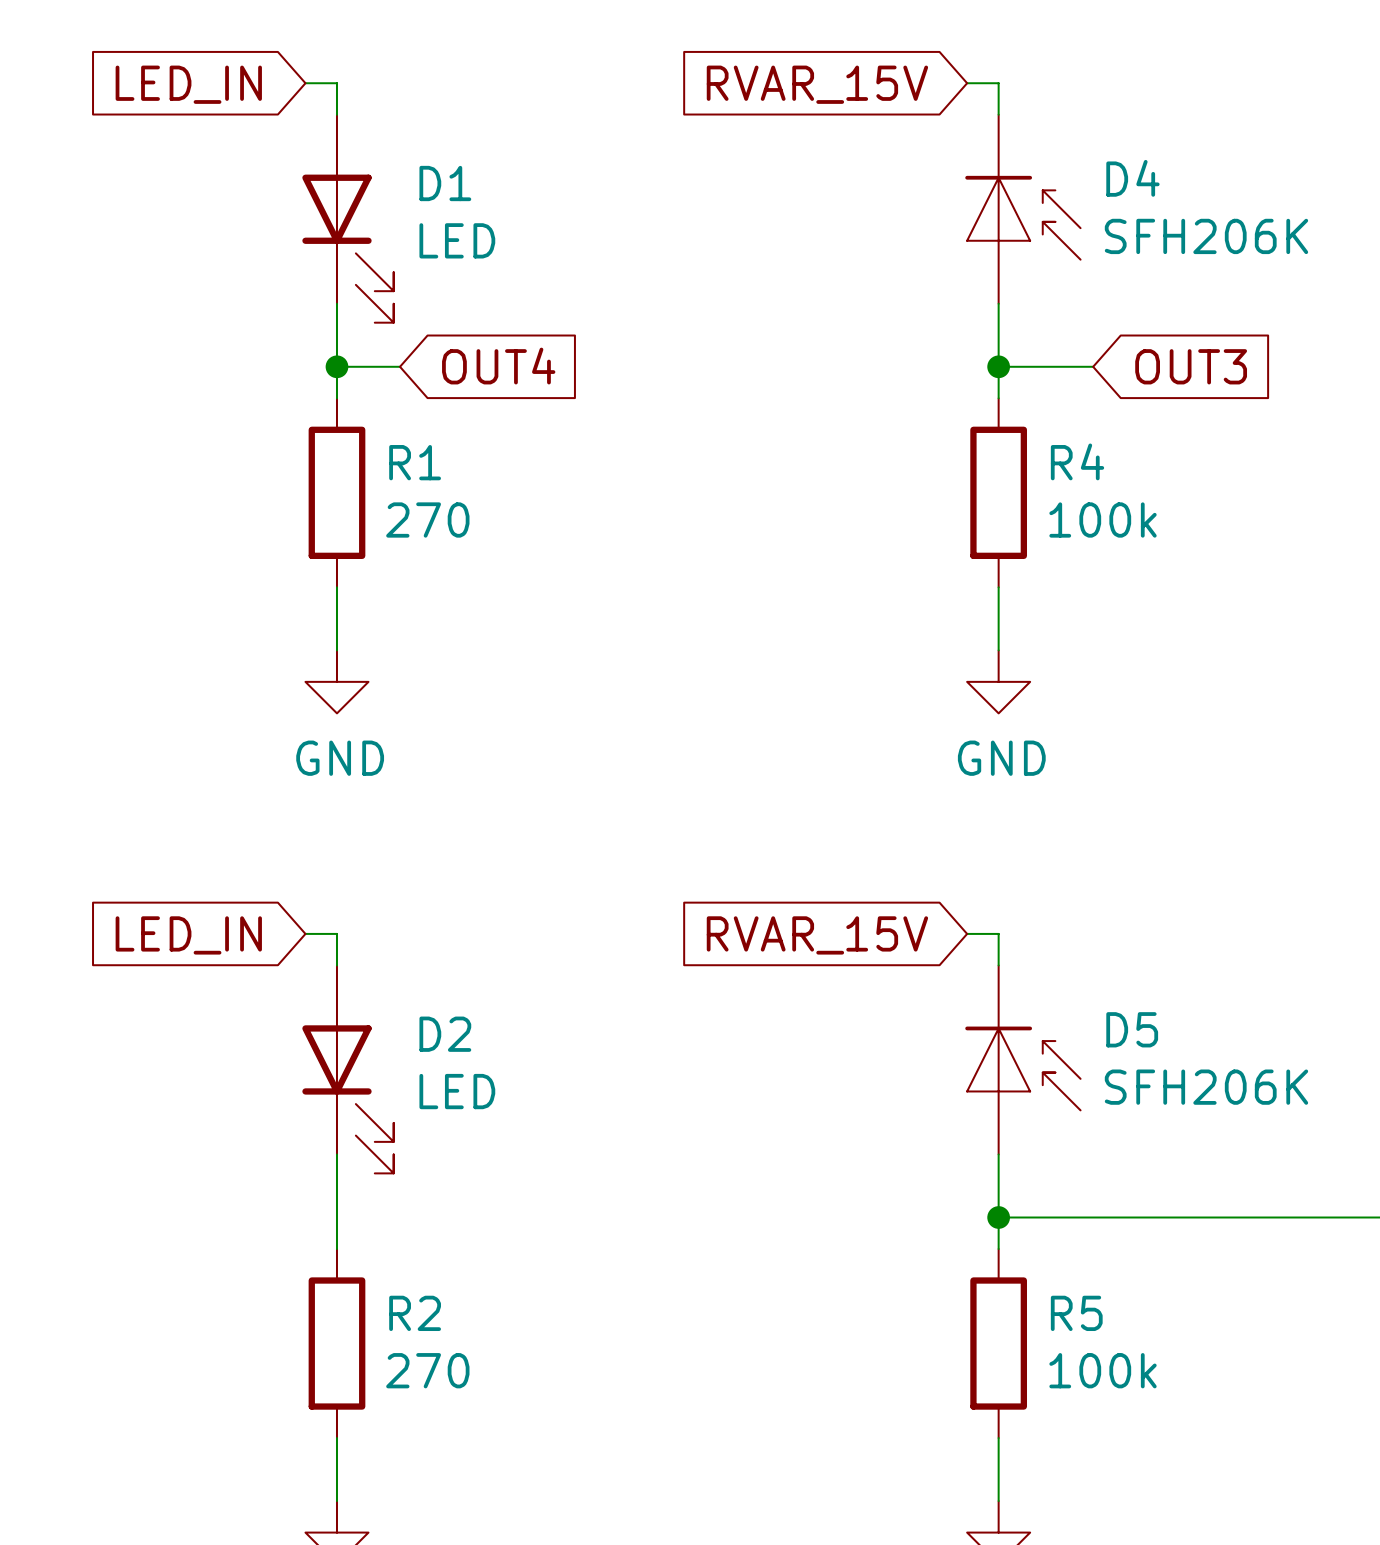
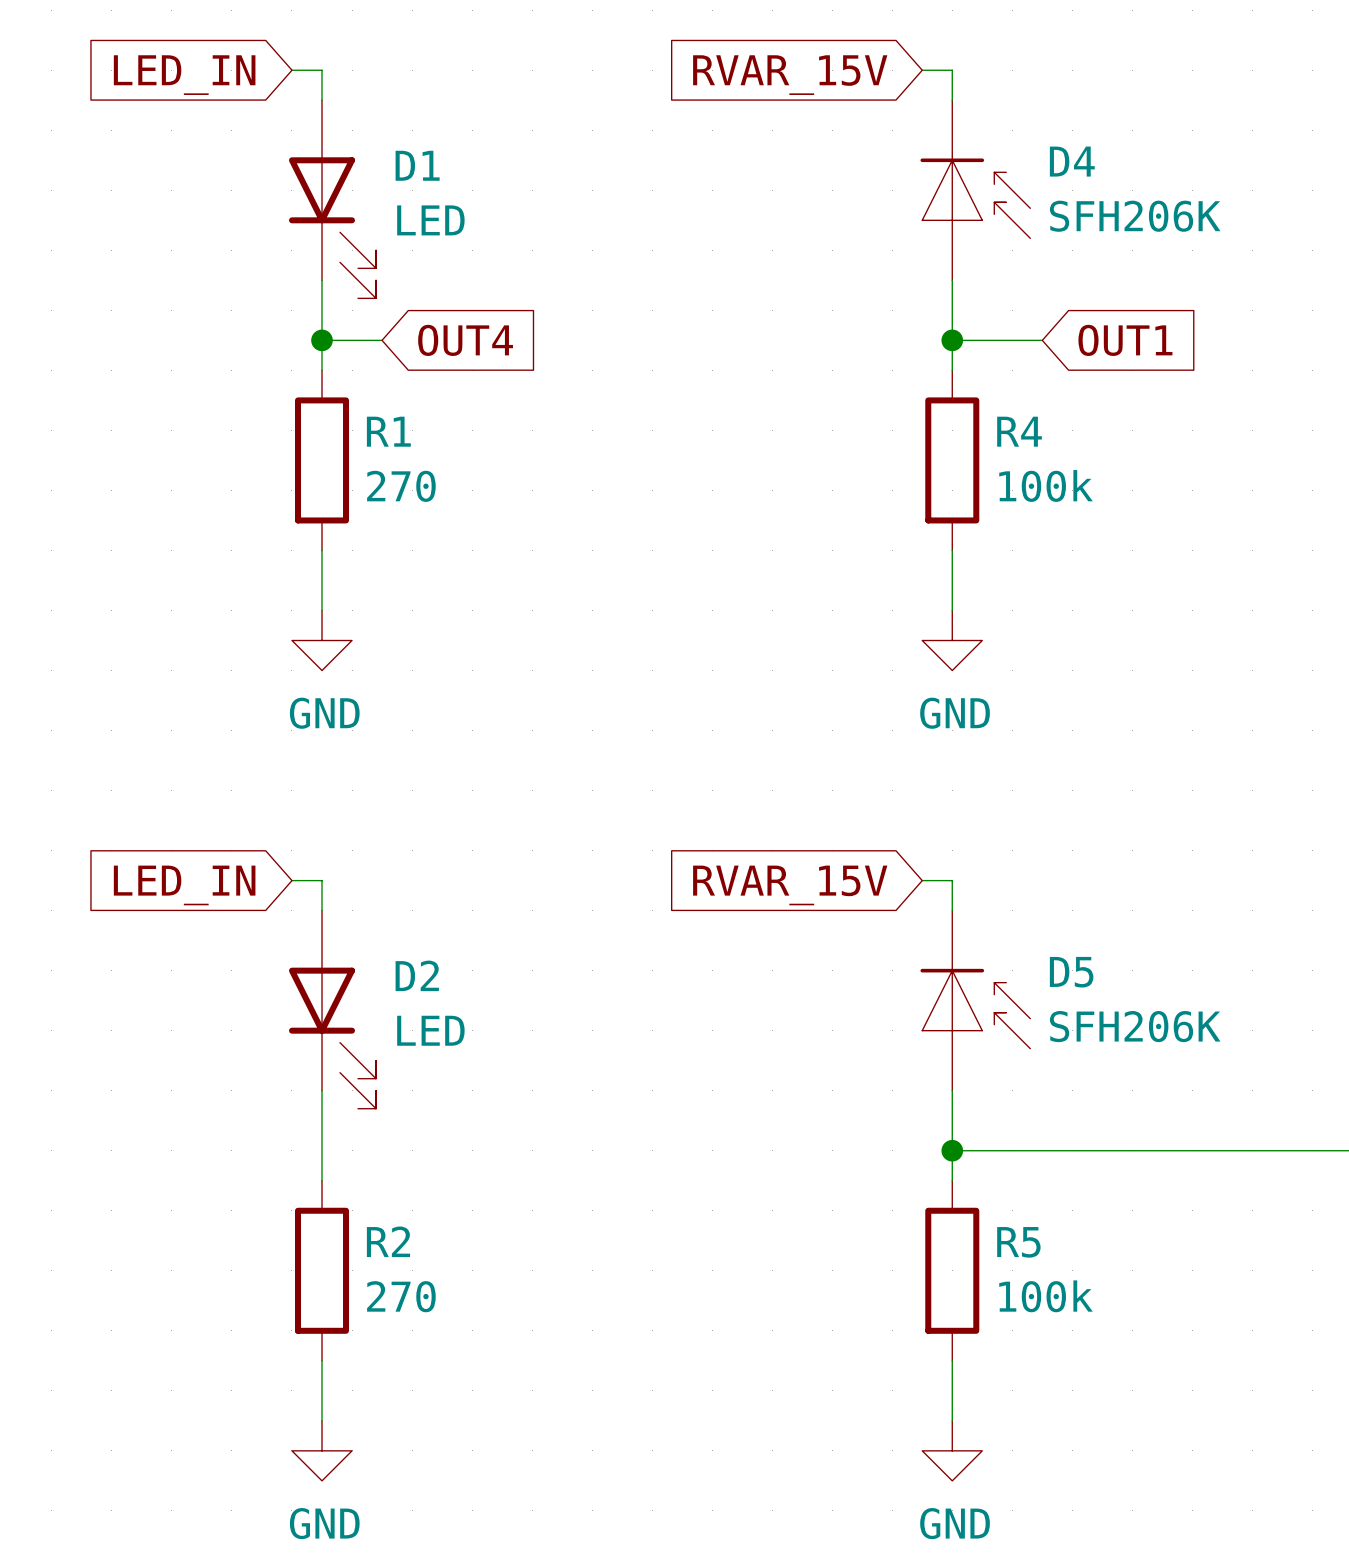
global label: OUT3 (1191, 366) -> OUT1 (1125, 340)

